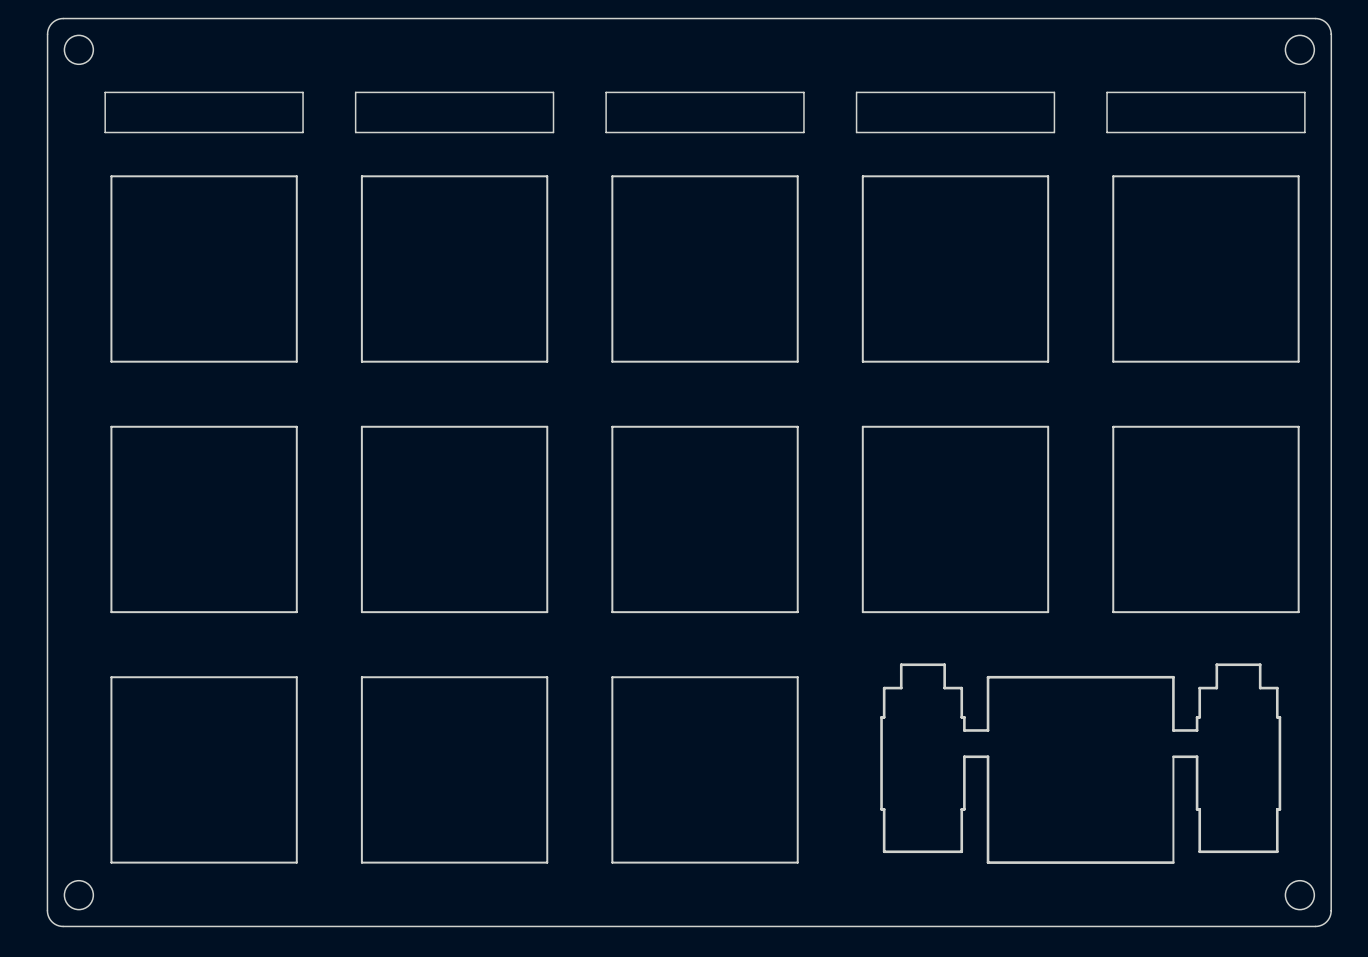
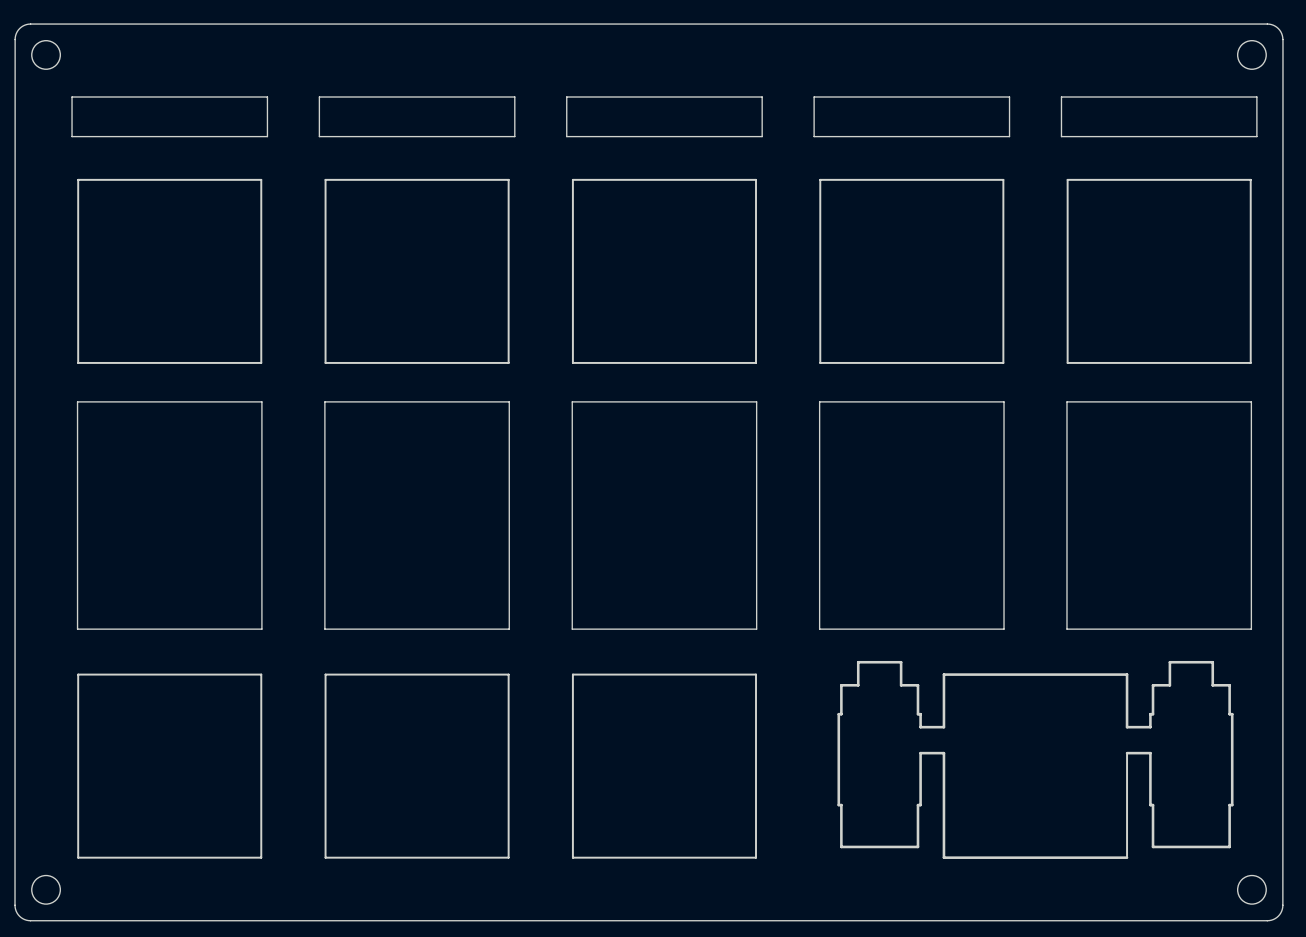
drawing shape: [110, 425, 298, 614] -> [77, 401, 263, 630]
drawing shape: [360, 425, 549, 614] -> [324, 401, 510, 630]
drawing shape: [611, 425, 799, 614] -> [571, 401, 758, 630]
drawing shape: [861, 425, 1050, 614] -> [819, 401, 1005, 630]
drawing shape: [1112, 425, 1300, 614] -> [1066, 401, 1252, 630]

